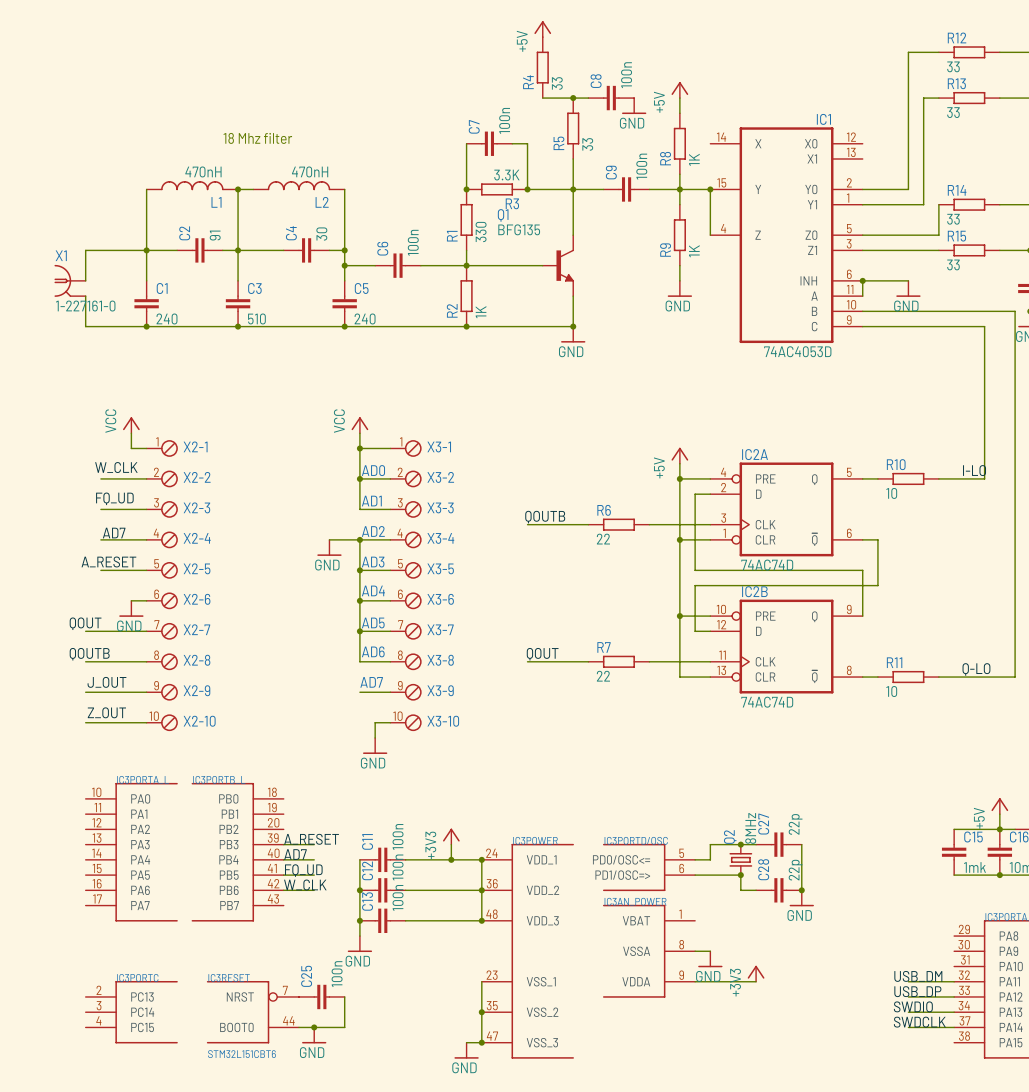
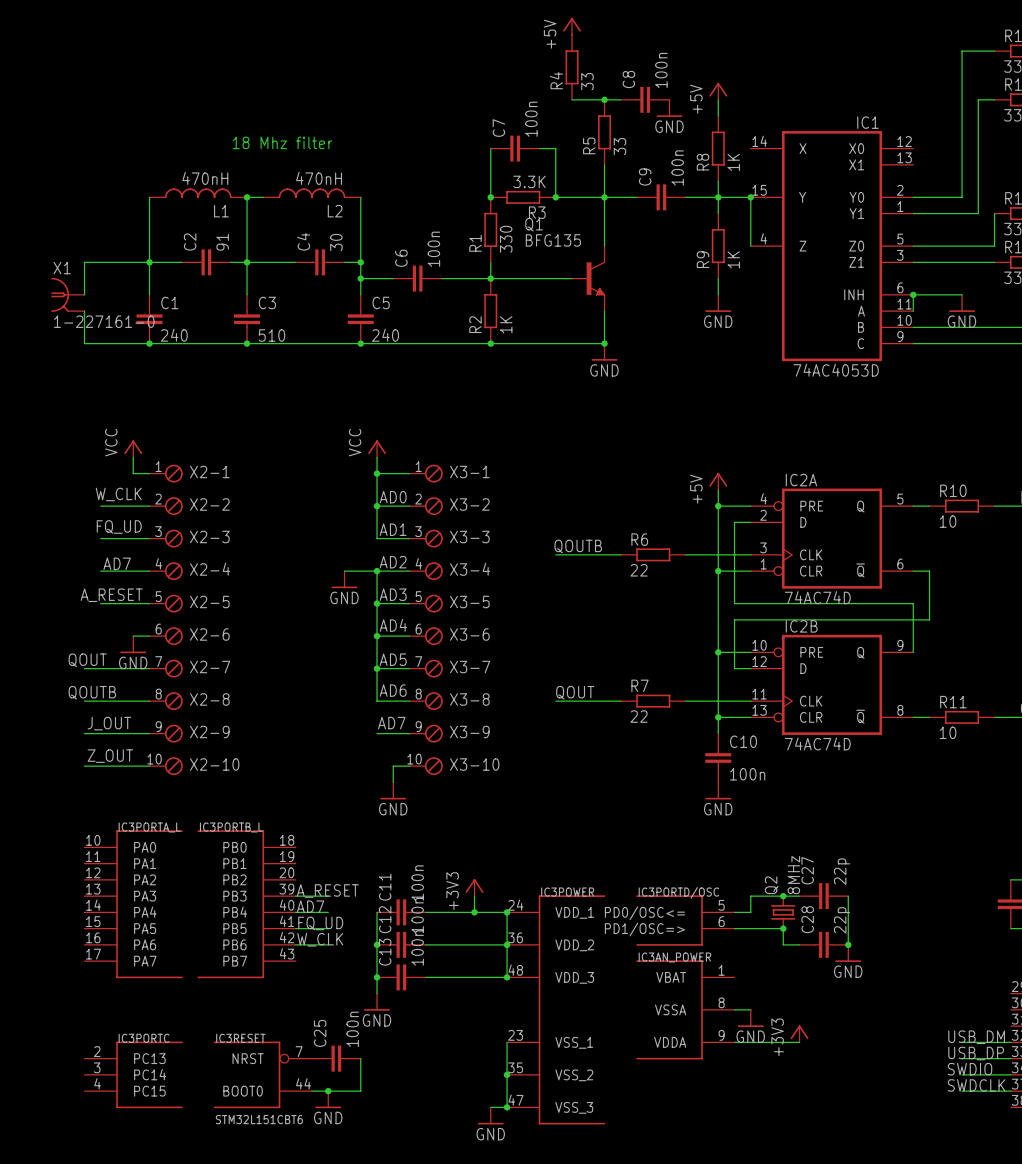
wire: none -> (718, 717) (718, 733)
junction: none -> (718, 717)
C10: none -> 100n (718, 758)
power symbol: none -> GND (718, 790)

